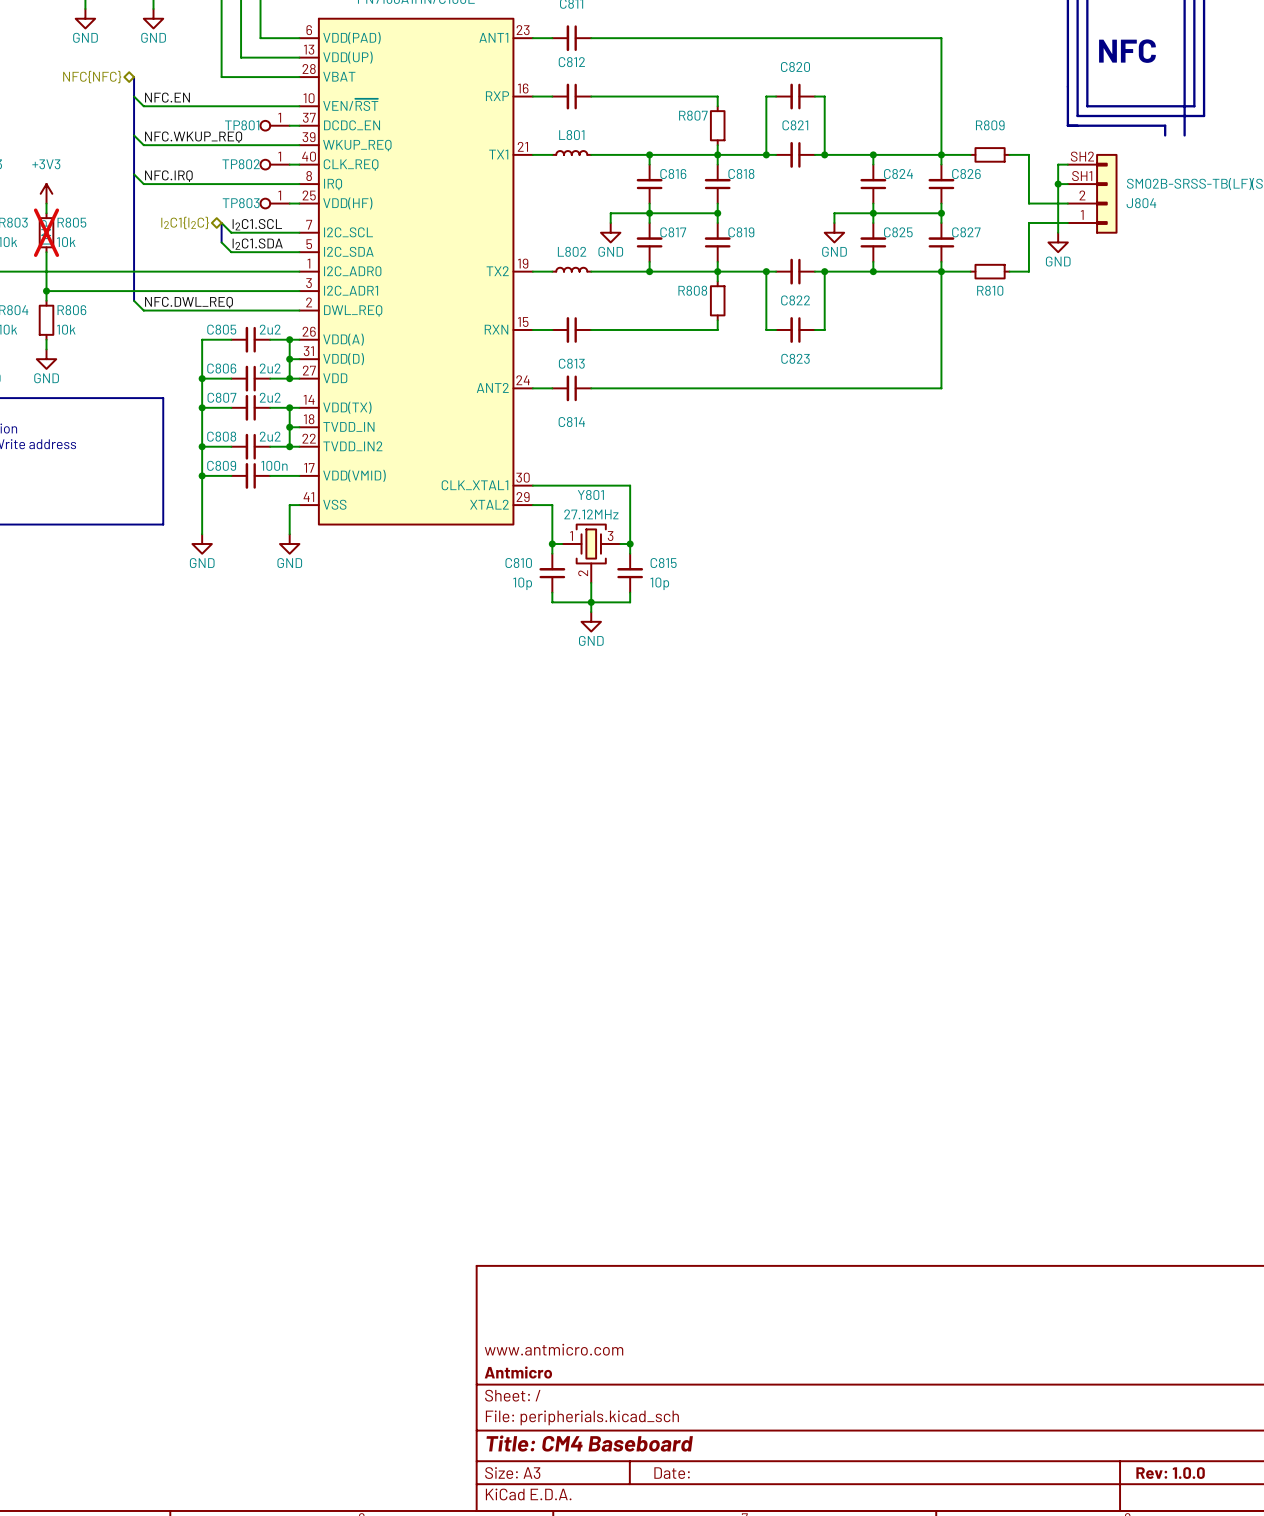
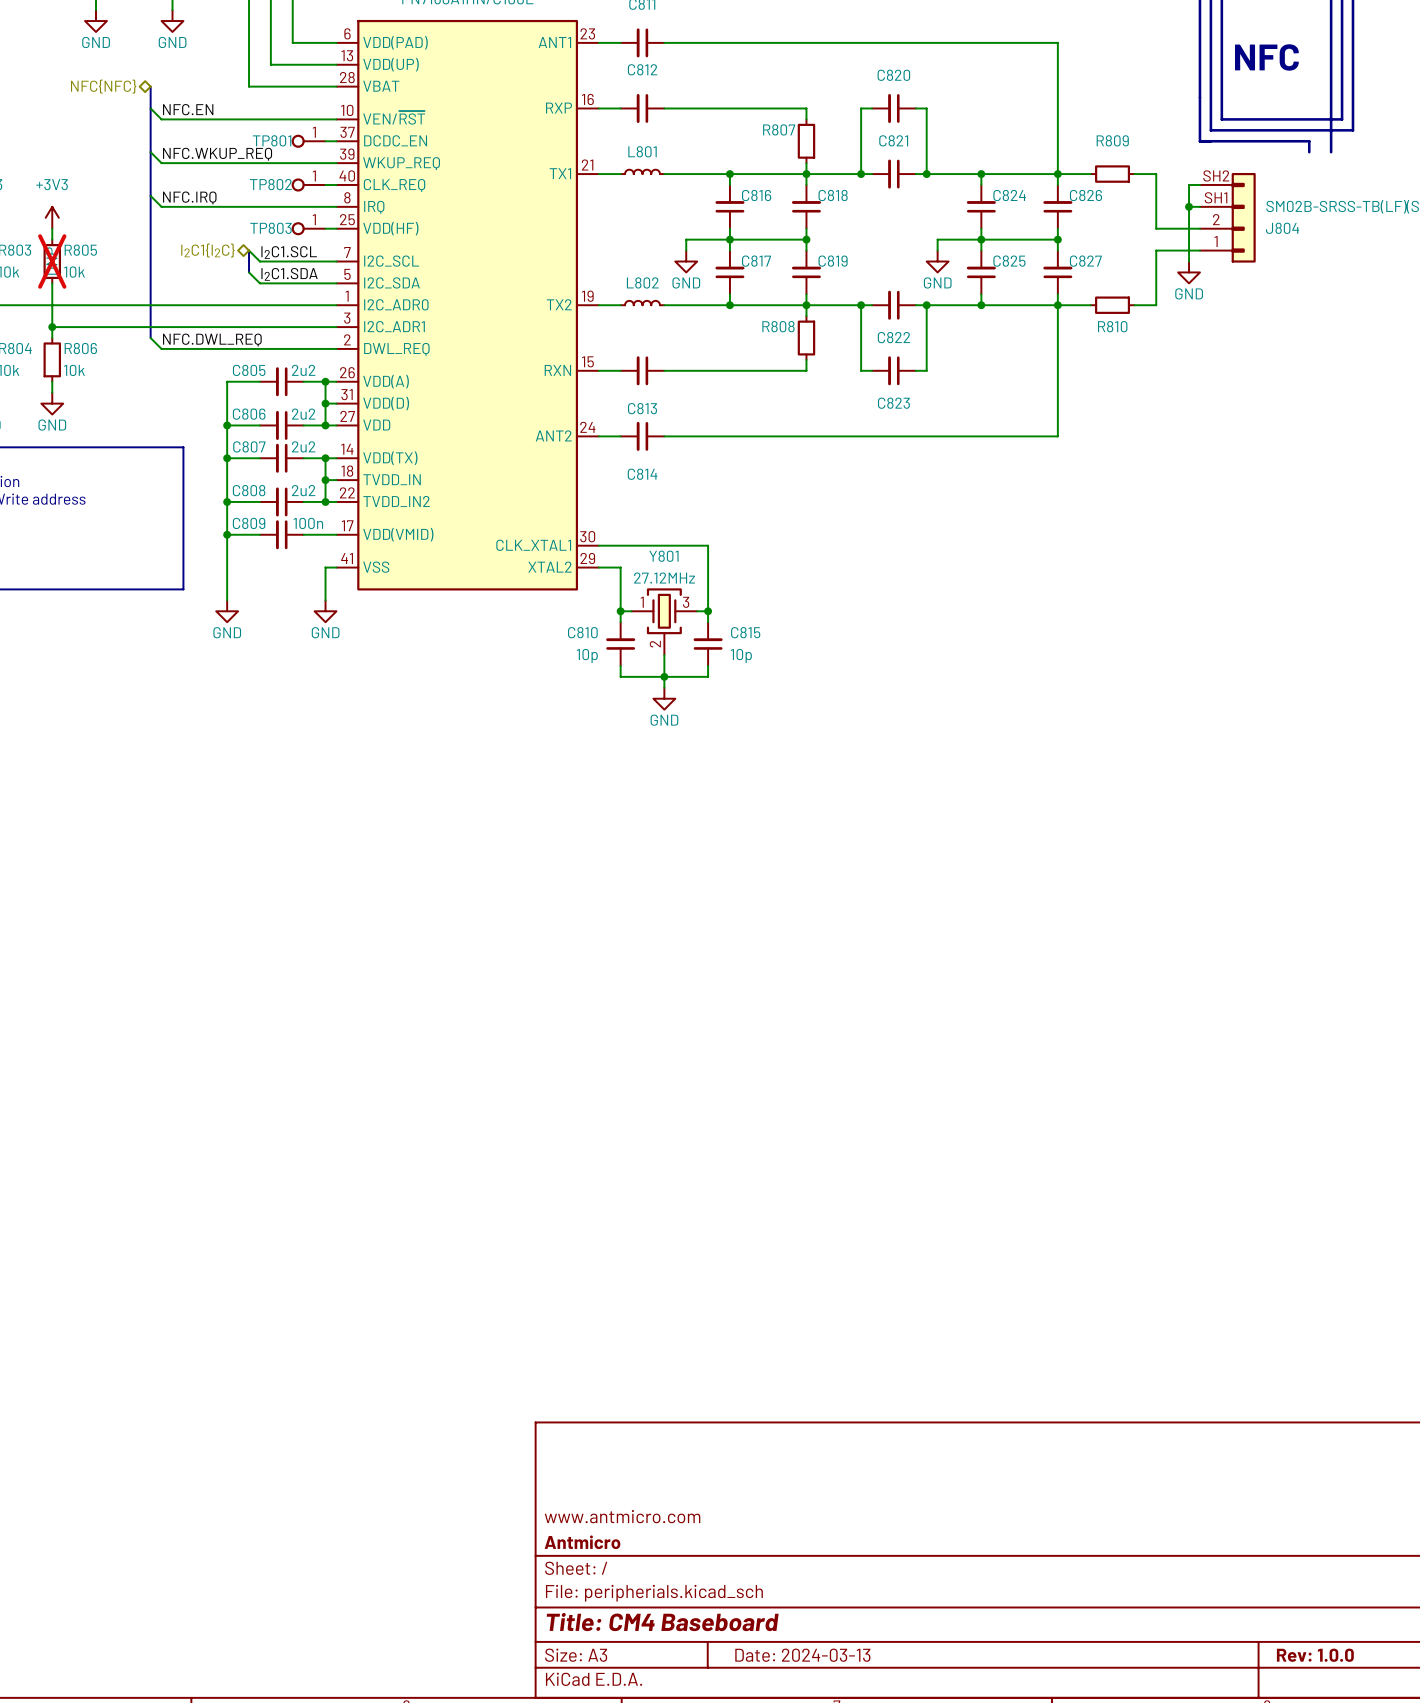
title block: Date: (672, 1473) -> Date: 2024-03-13 (802, 1655)

